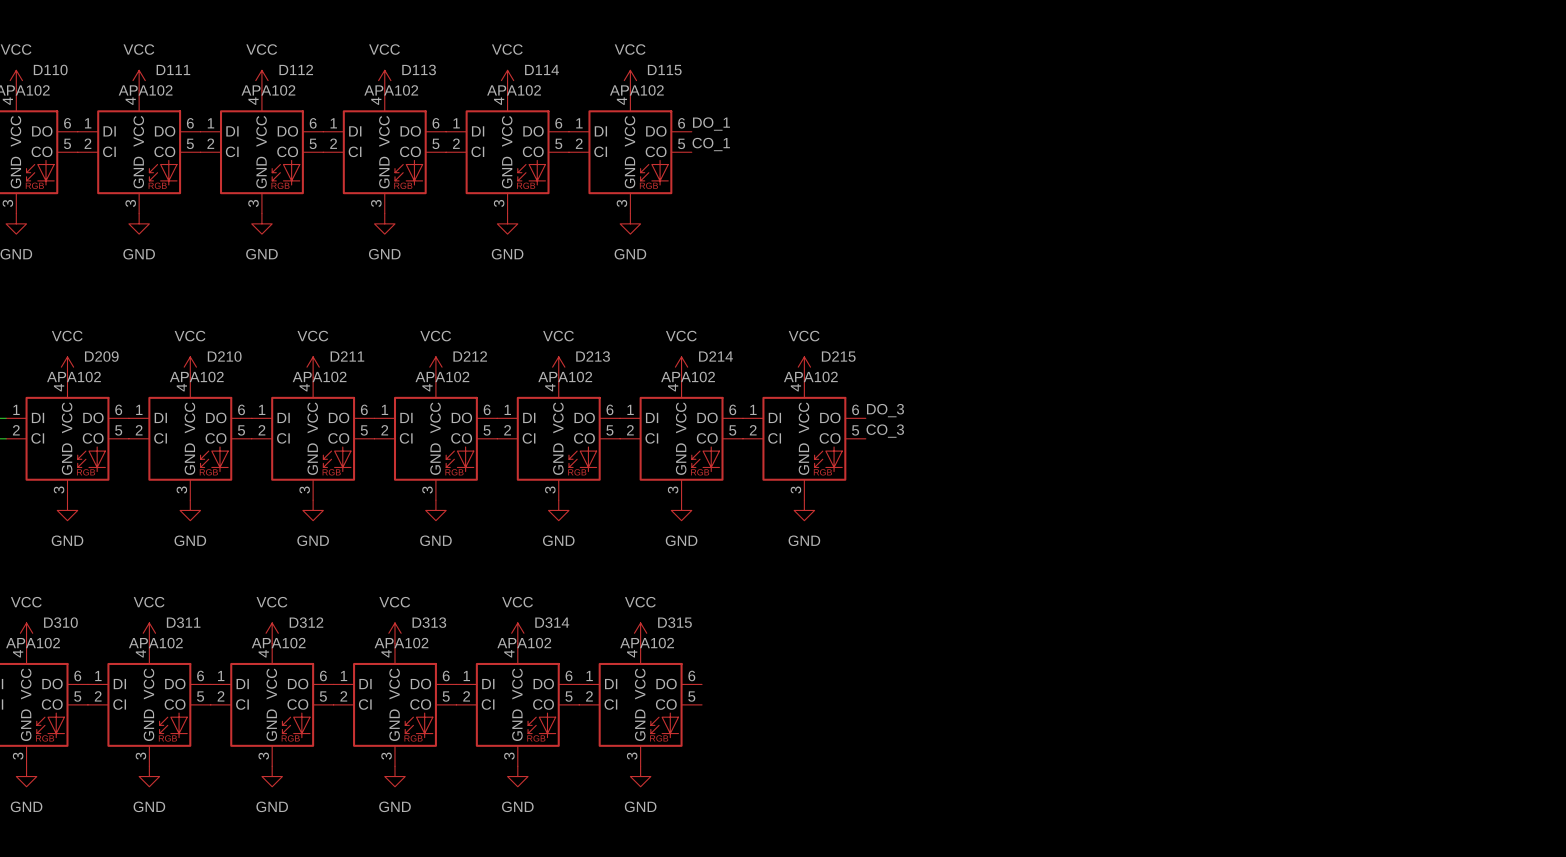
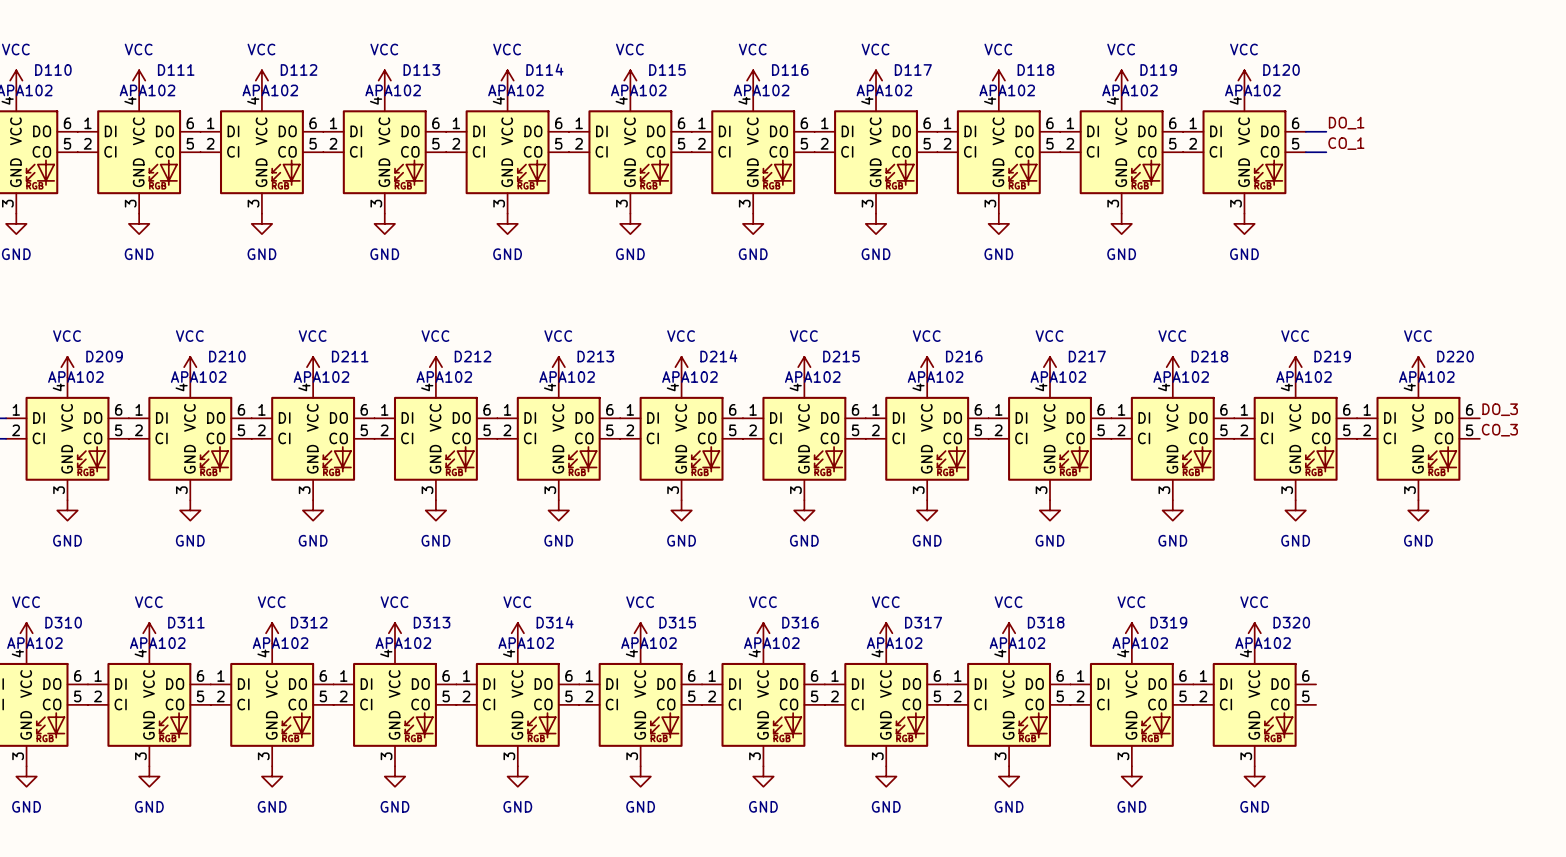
power symbol: none -> VCC (753, 80)
power symbol: none -> VCC (876, 80)
power symbol: none -> VCC (998, 80)
power symbol: none -> VCC (1121, 80)
power symbol: none -> VCC (1244, 80)
label: DO_1 (711, 124) -> none
label: none -> DO_1 (1346, 123)
wire: none -> (1305, 131) (1326, 131)
label: CO_1 (711, 144) -> none
label: none -> CO_1 (1346, 143)
D116: none -> APA102 (753, 152)
D117: none -> APA102 (876, 152)
D118: none -> APA102 (998, 152)
D119: none -> APA102 (1121, 152)
D120: none -> APA102 (1244, 152)
wire: none -> (1305, 152) (1326, 152)
power symbol: none -> GND (753, 223)
power symbol: none -> GND (876, 223)
power symbol: none -> GND (998, 223)
power symbol: none -> GND (1121, 223)
power symbol: none -> GND (1244, 223)
power symbol: none -> VCC (927, 367)
power symbol: none -> VCC (1050, 367)
power symbol: none -> VCC (1172, 367)
power symbol: none -> VCC (1295, 367)
power symbol: none -> VCC (1418, 367)
label: DO_3 (885, 410) -> none
label: none -> DO_3 (1500, 409)
label: CO_3 (885, 431) -> none
label: none -> CO_3 (1499, 430)
D216: none -> APA102 (927, 438)
D217: none -> APA102 (1050, 438)
D218: none -> APA102 (1172, 438)
D219: none -> APA102 (1295, 438)
D220: none -> APA102 (1418, 438)
power symbol: none -> GND (927, 510)
power symbol: none -> GND (1050, 510)
power symbol: none -> GND (1172, 510)
power symbol: none -> GND (1295, 510)
power symbol: none -> GND (1418, 510)
power symbol: none -> VCC (763, 633)
power symbol: none -> VCC (886, 633)
power symbol: none -> VCC (1009, 633)
power symbol: none -> VCC (1131, 633)
power symbol: none -> VCC (1254, 633)
D316: none -> APA102 (763, 704)
D317: none -> APA102 (886, 704)
D318: none -> APA102 (1009, 704)
D319: none -> APA102 (1131, 704)
D320: none -> APA102 (1254, 704)
power symbol: none -> GND (763, 776)
power symbol: none -> GND (886, 776)
power symbol: none -> GND (1009, 776)
power symbol: none -> GND (1131, 776)
power symbol: none -> GND (1254, 776)

